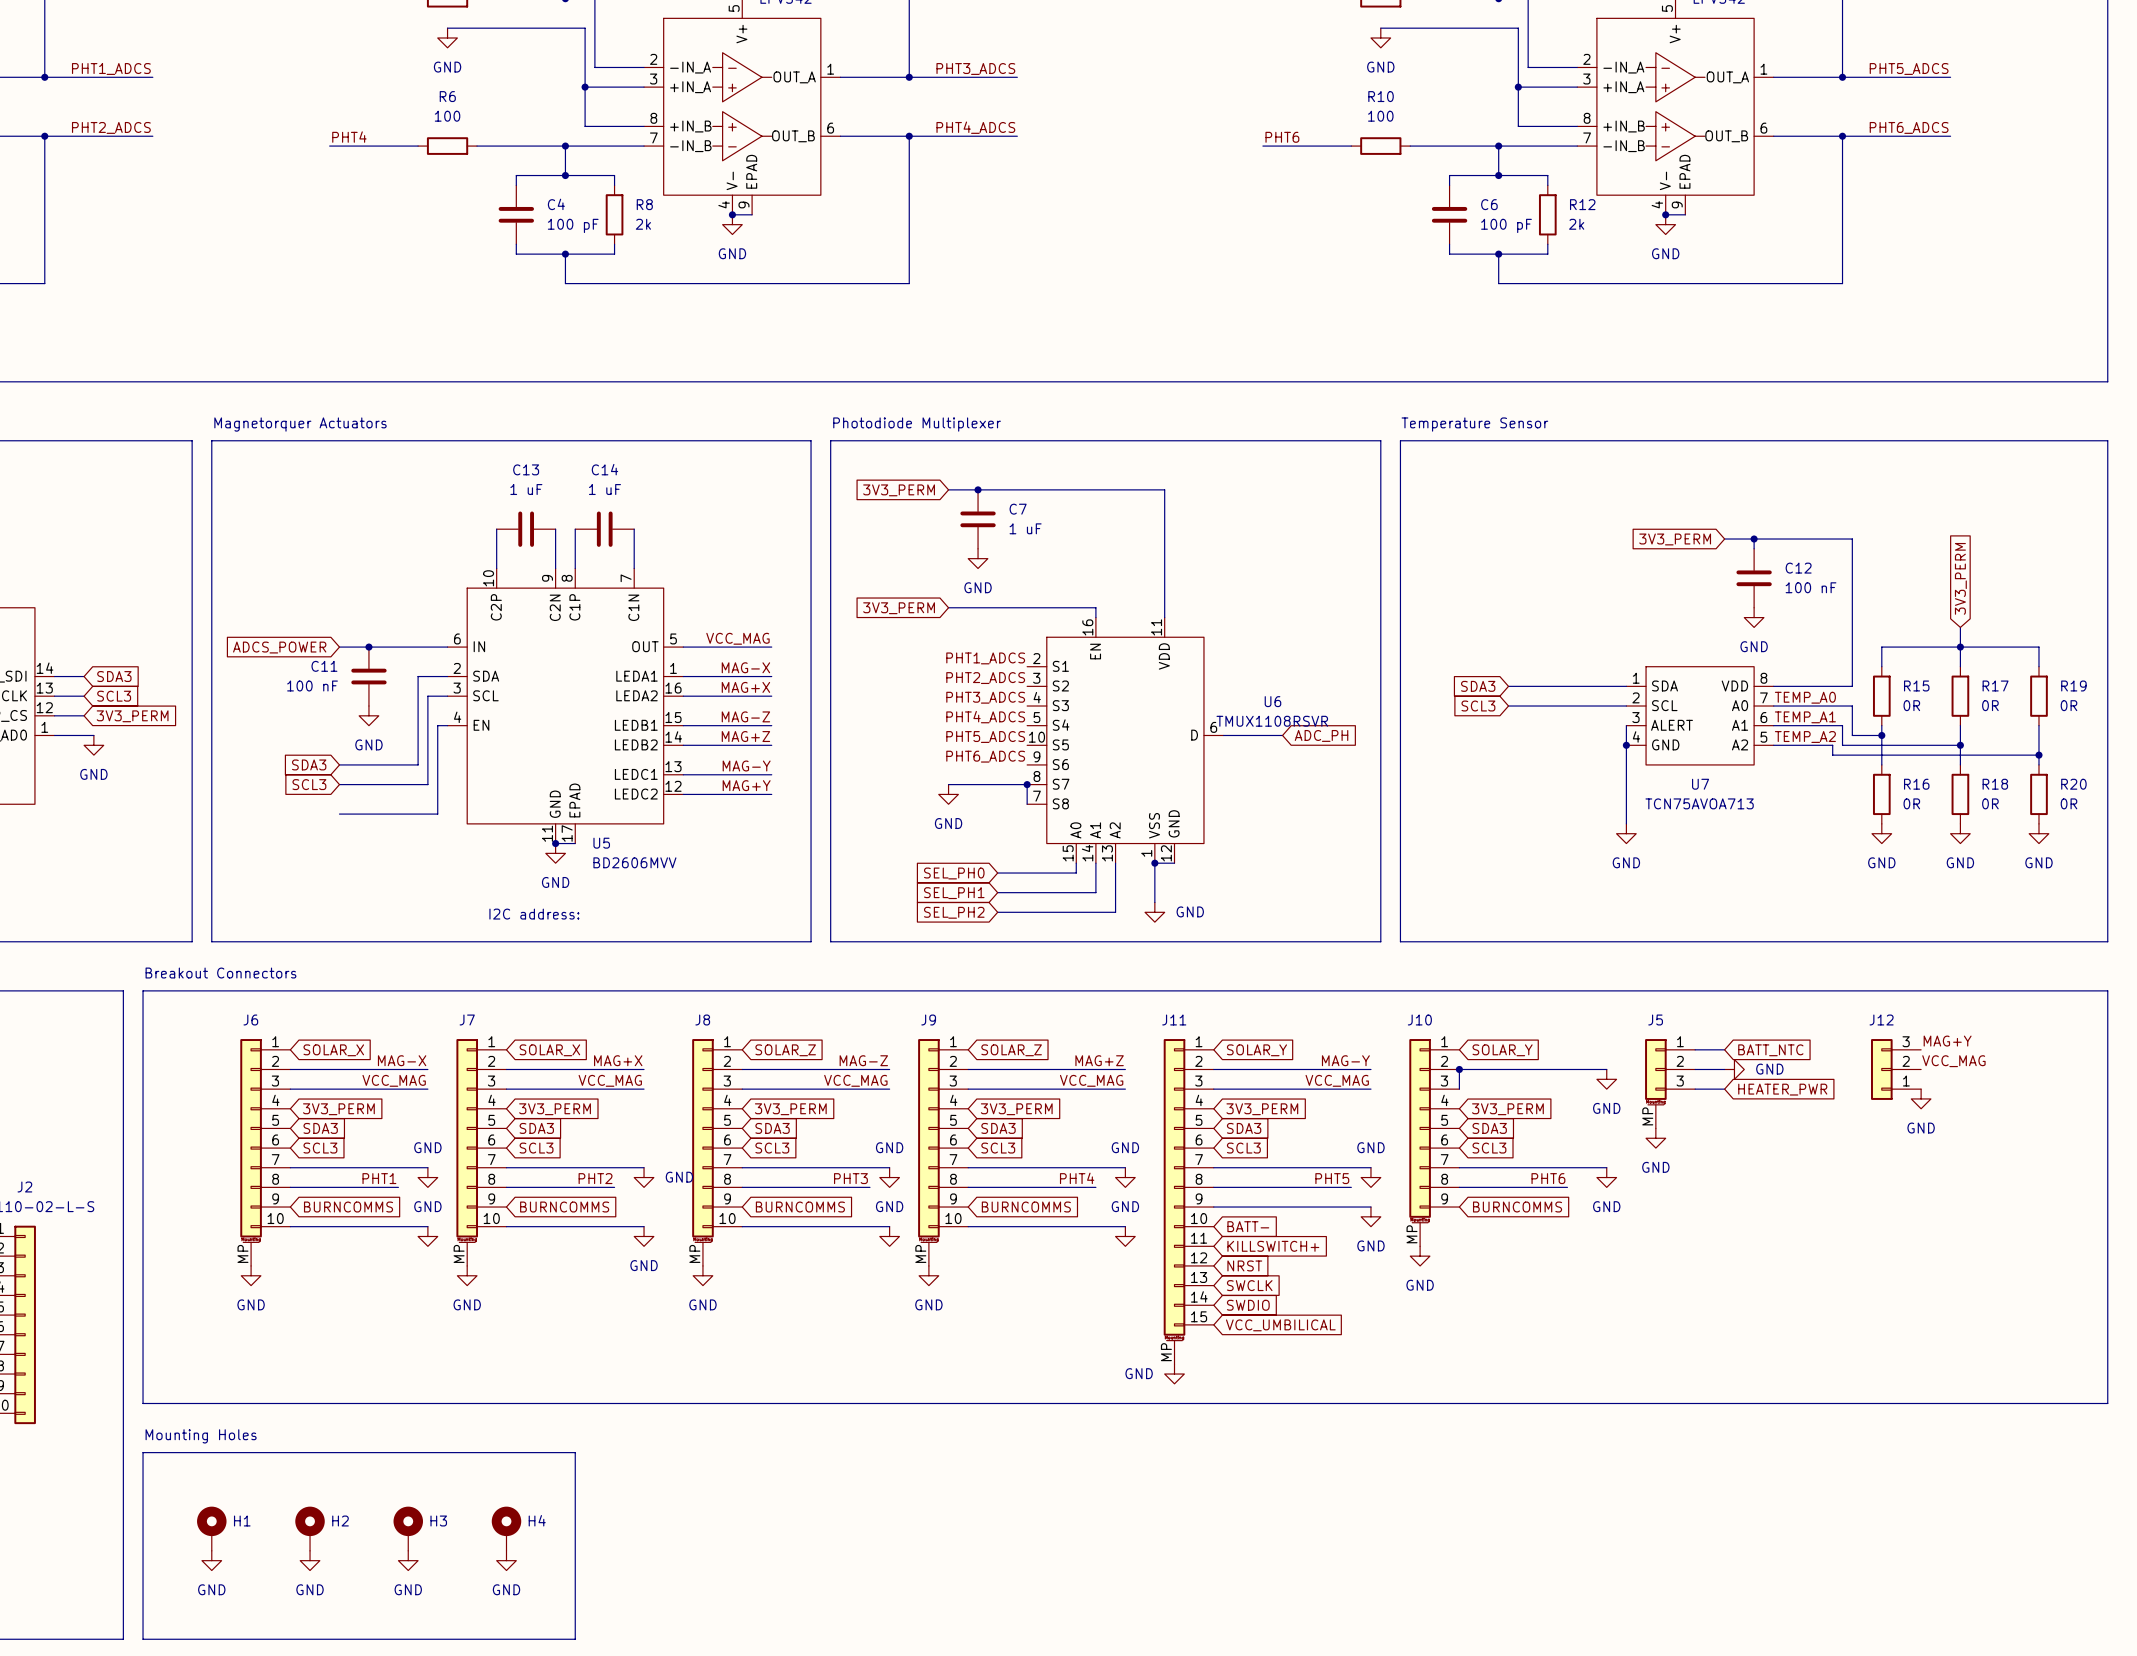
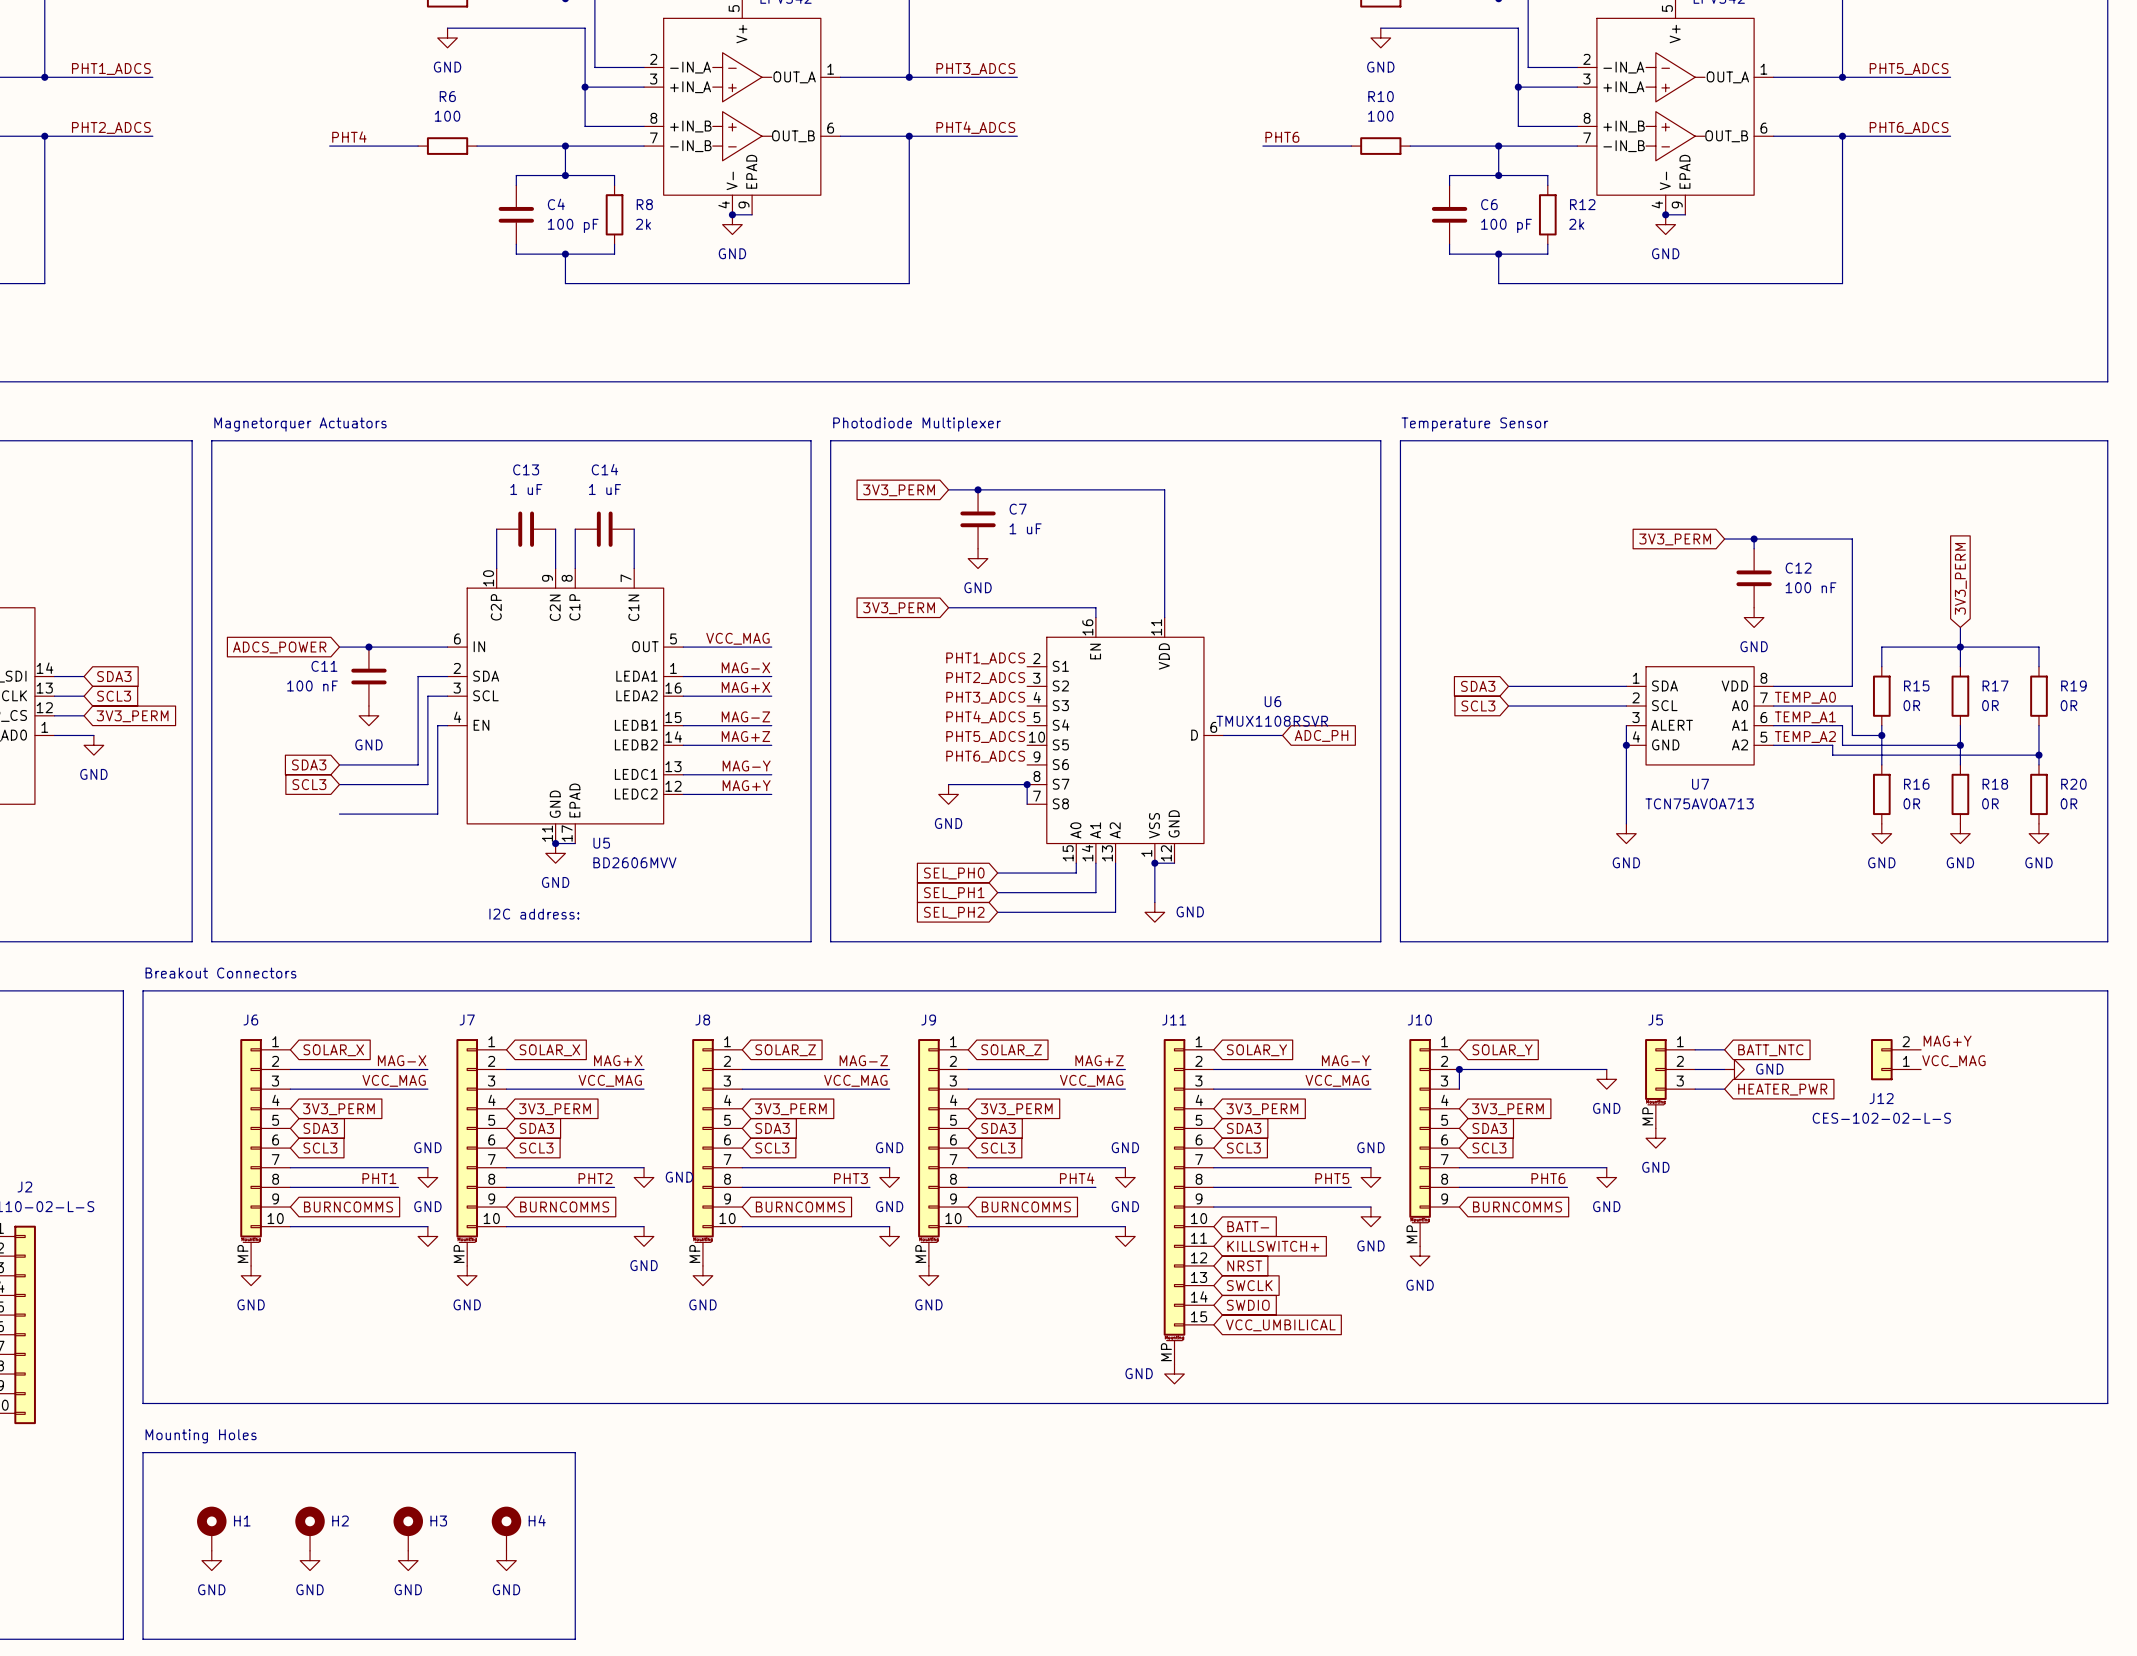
J12 name position: J12 (1881, 1020) -> J12 (1881, 1098)
J12 symbol: [1871, 1039, 1922, 1100] -> [1871, 1039, 1922, 1081]
power symbol: GND (1921, 1098) -> none
J12 value: none -> CES-102-02-L-S (1881, 1118)

